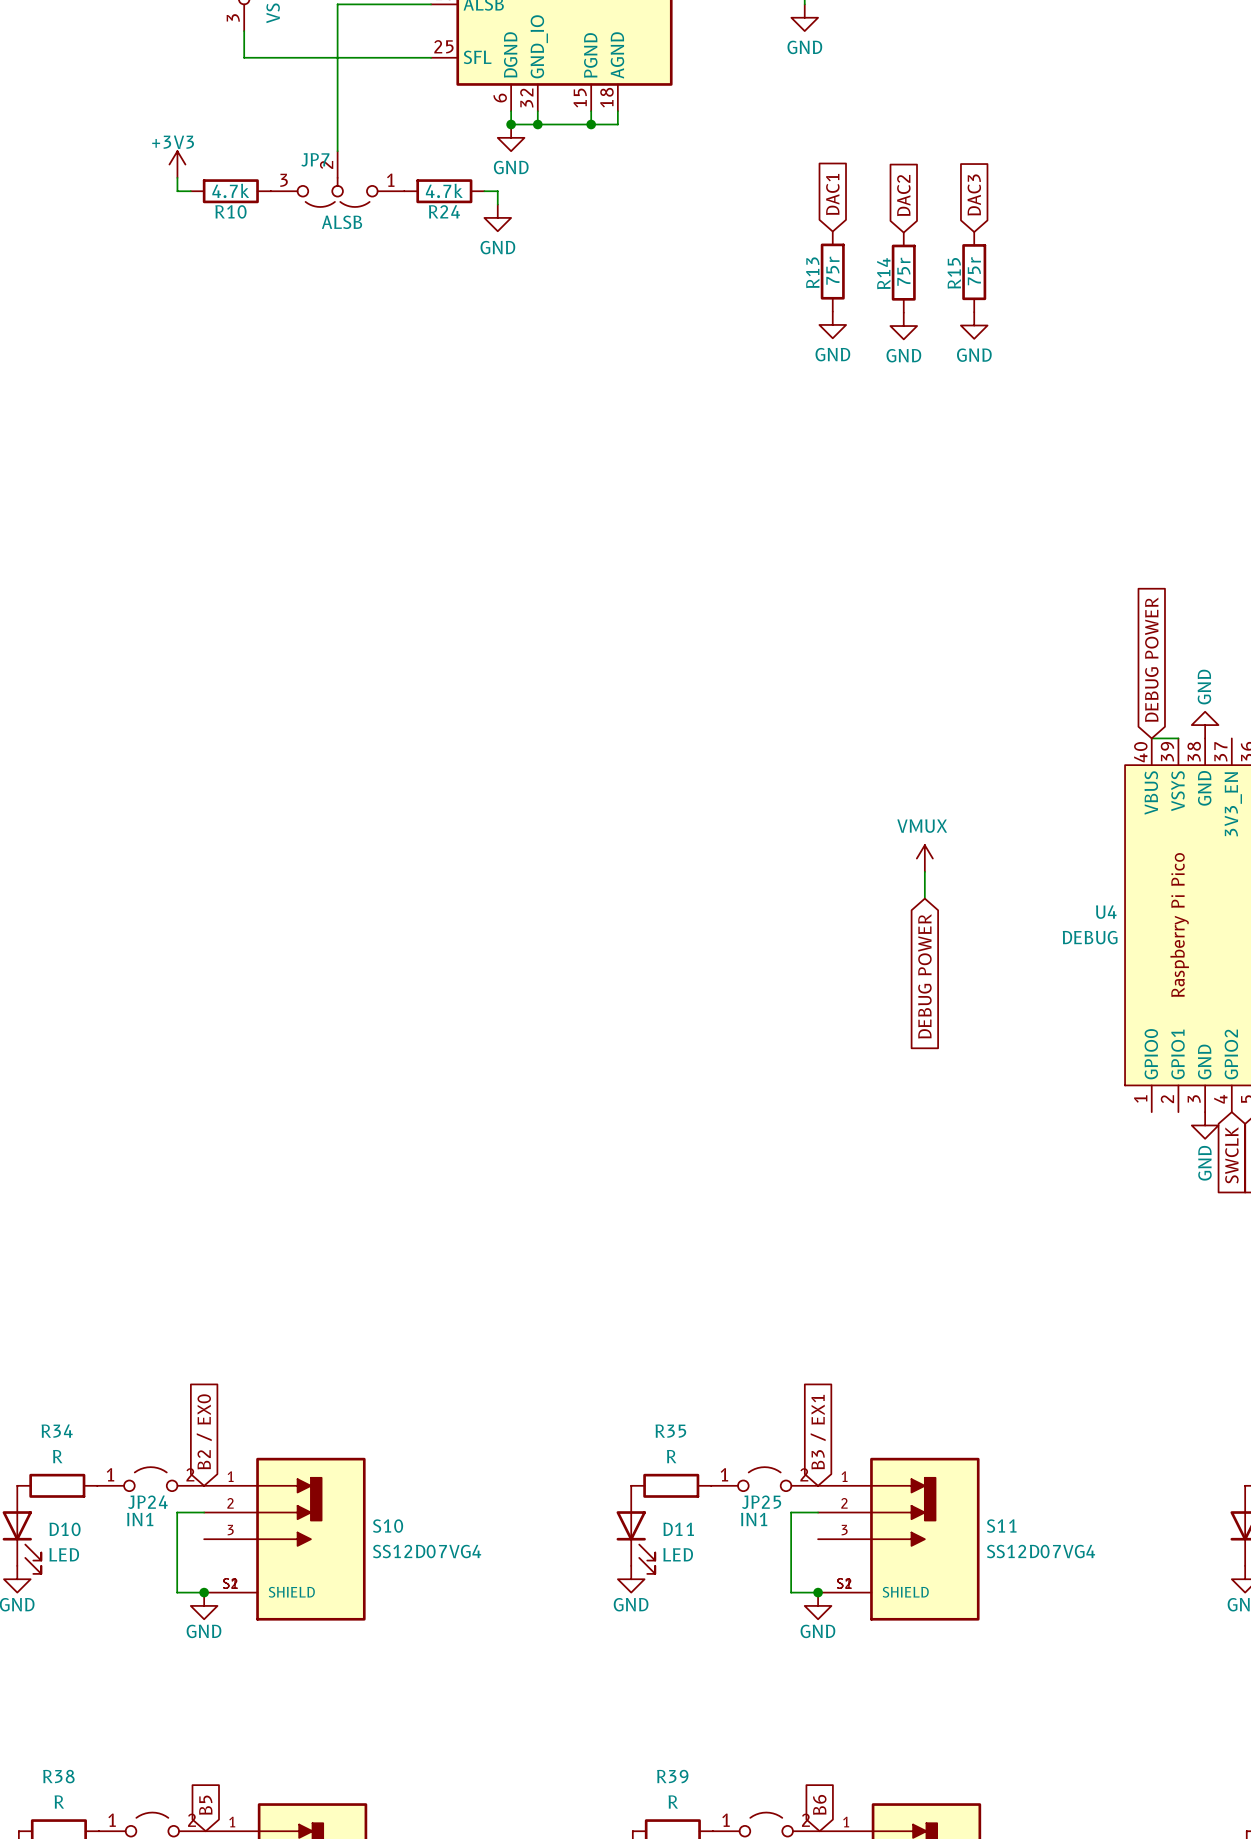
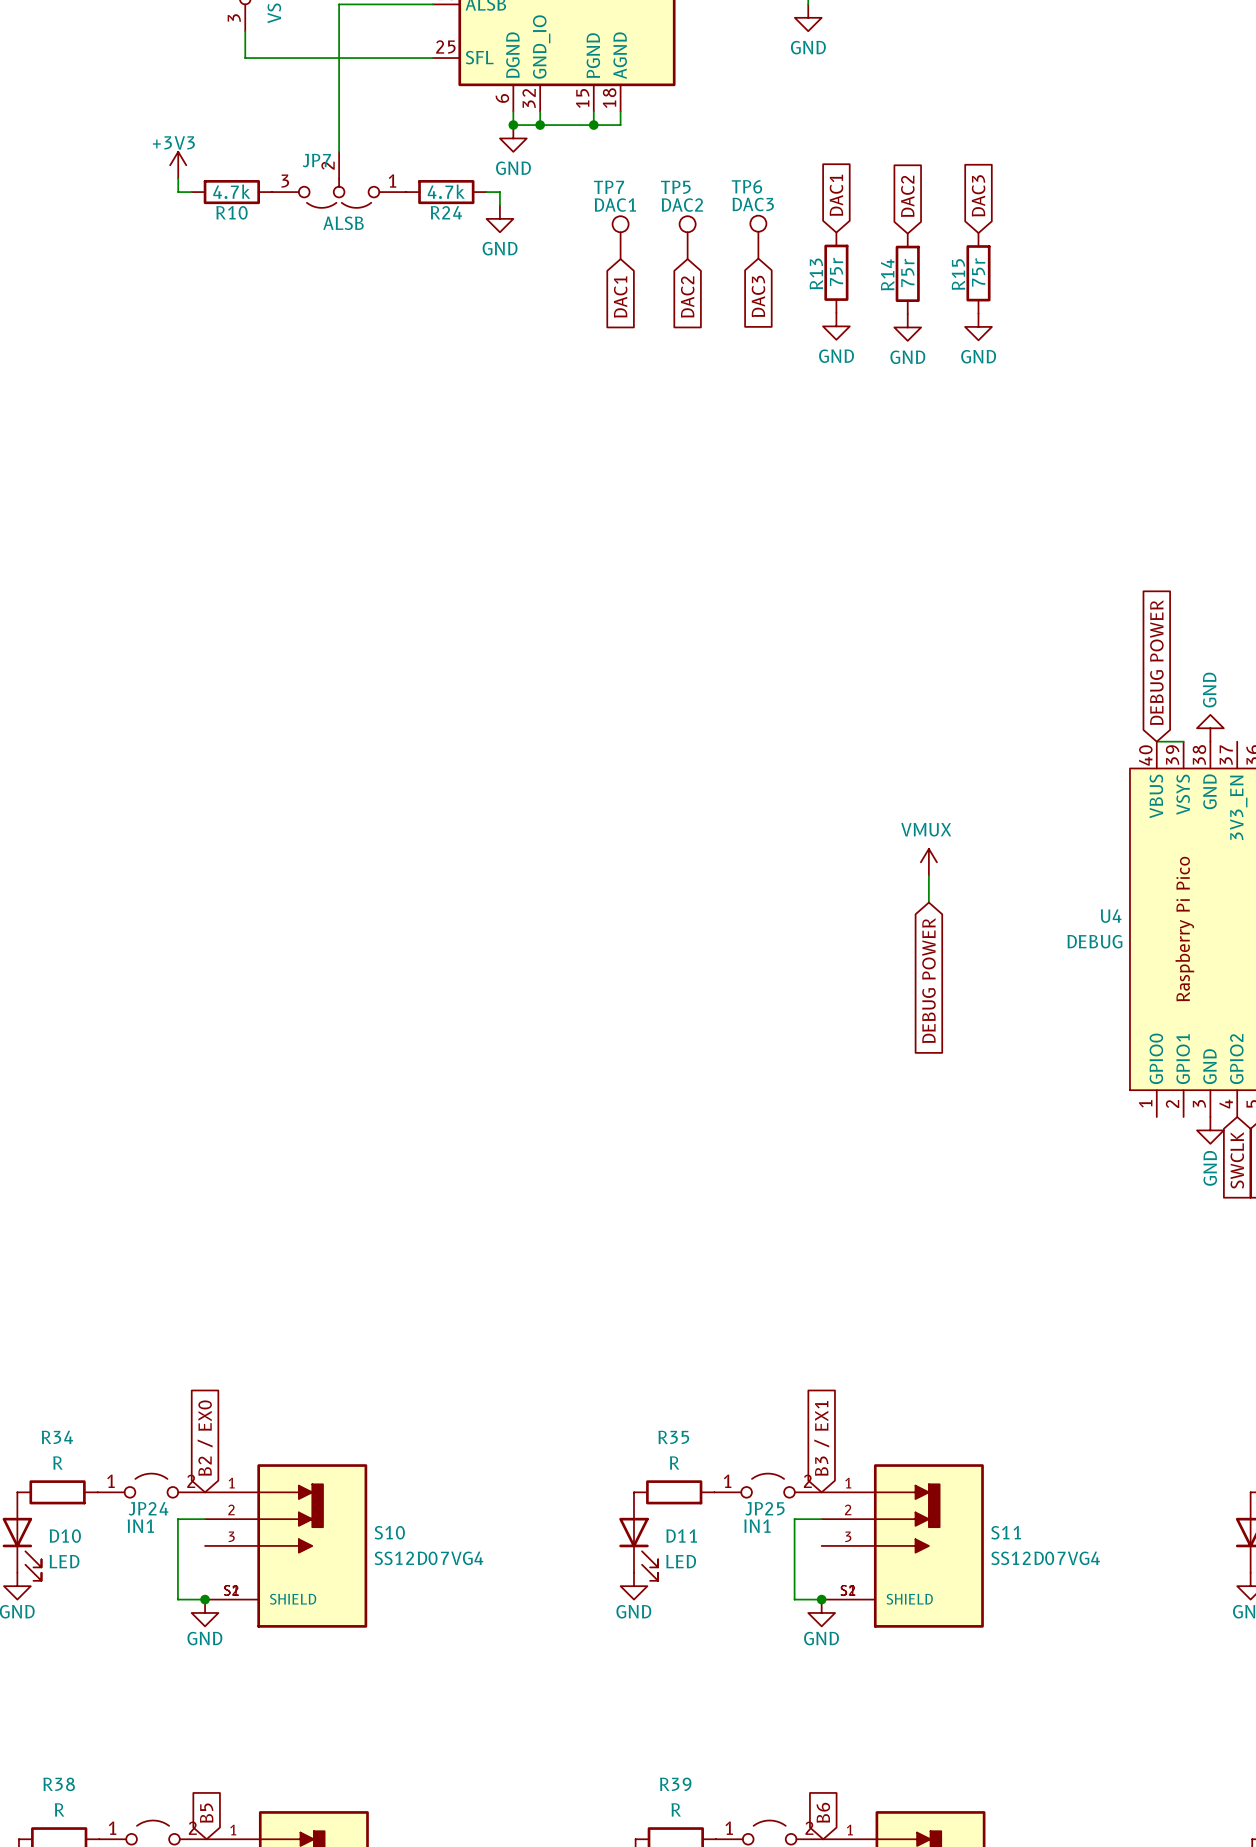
TP7: none -> DAC1 (620, 237)
TP5: none -> DAC2 (687, 237)
TP6: none -> DAC3 (758, 237)
global label: none -> DAC1 (620, 297)
global label: none -> DAC2 (687, 296)
global label: none -> DAC3 (758, 296)

